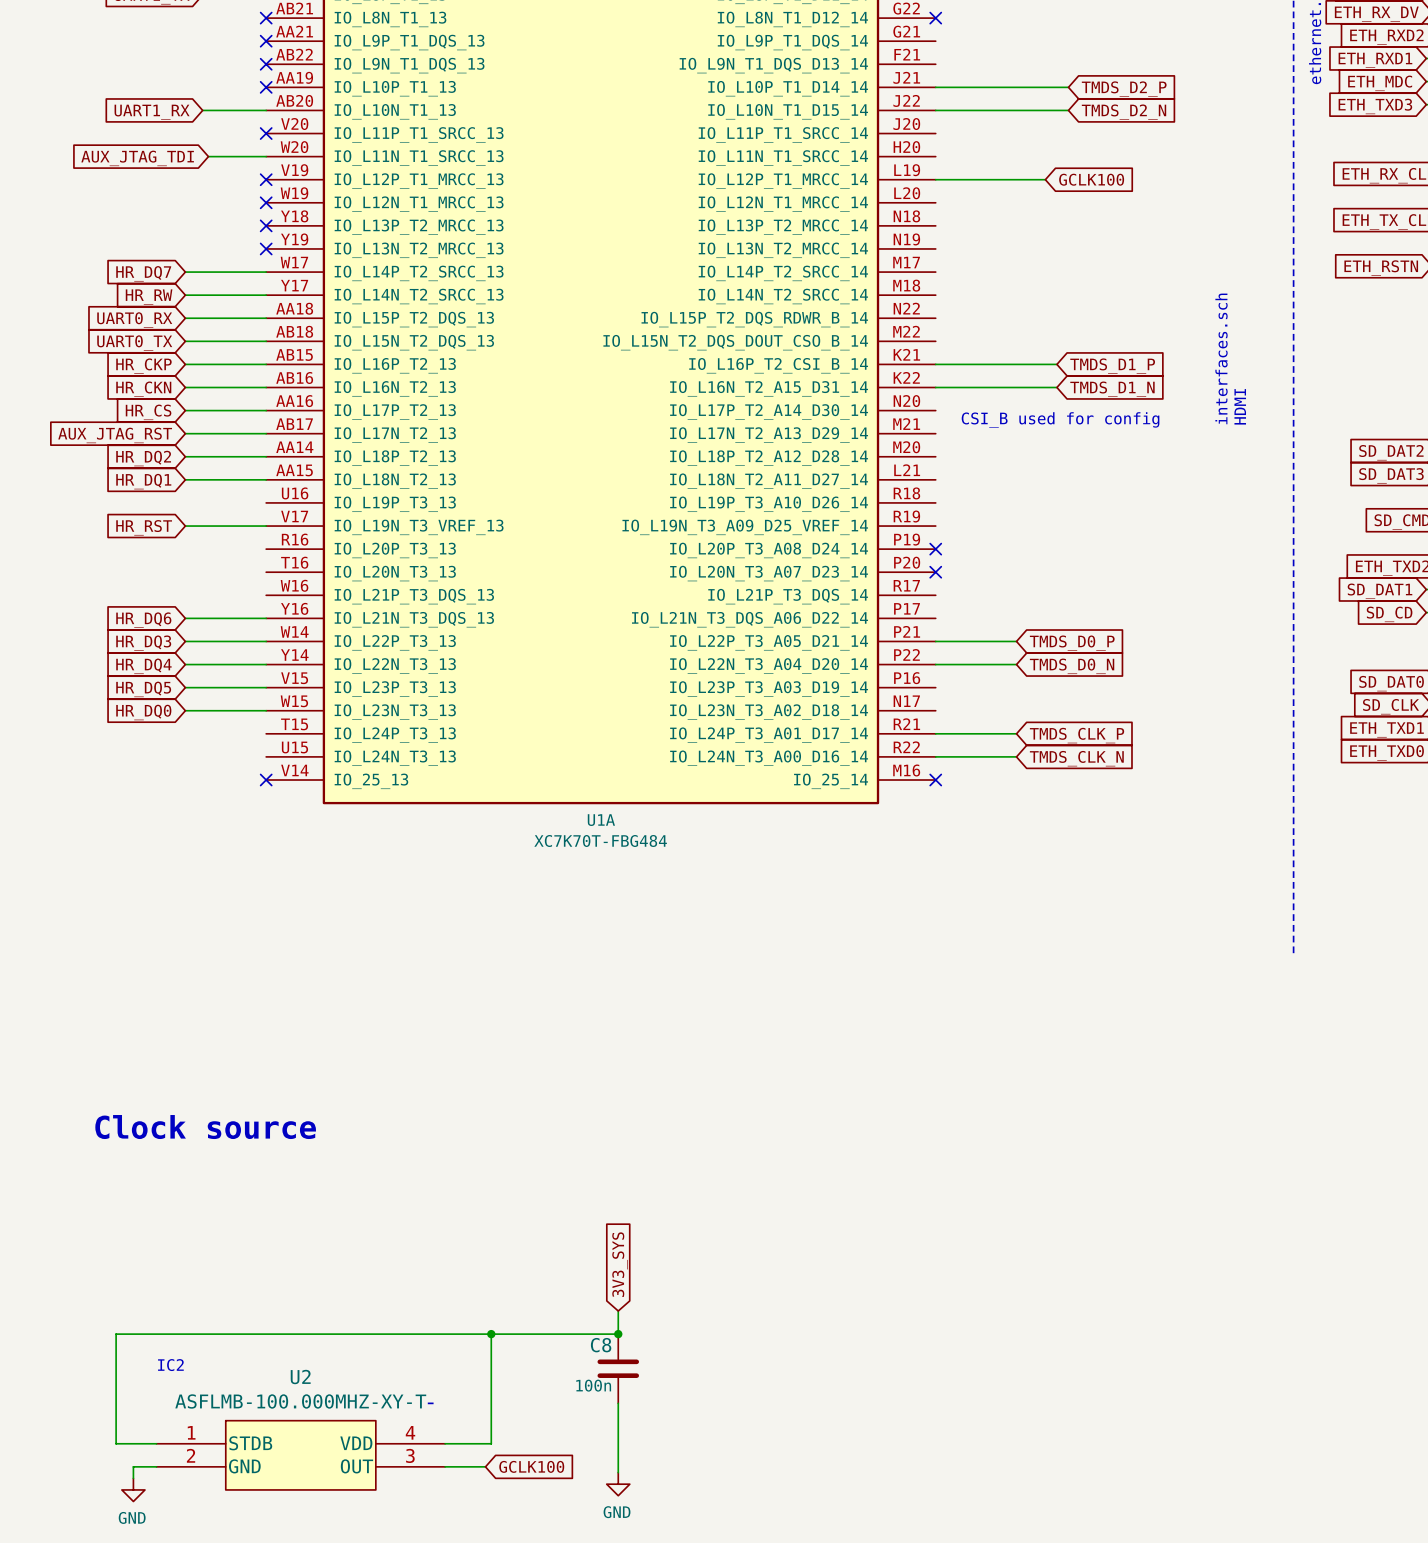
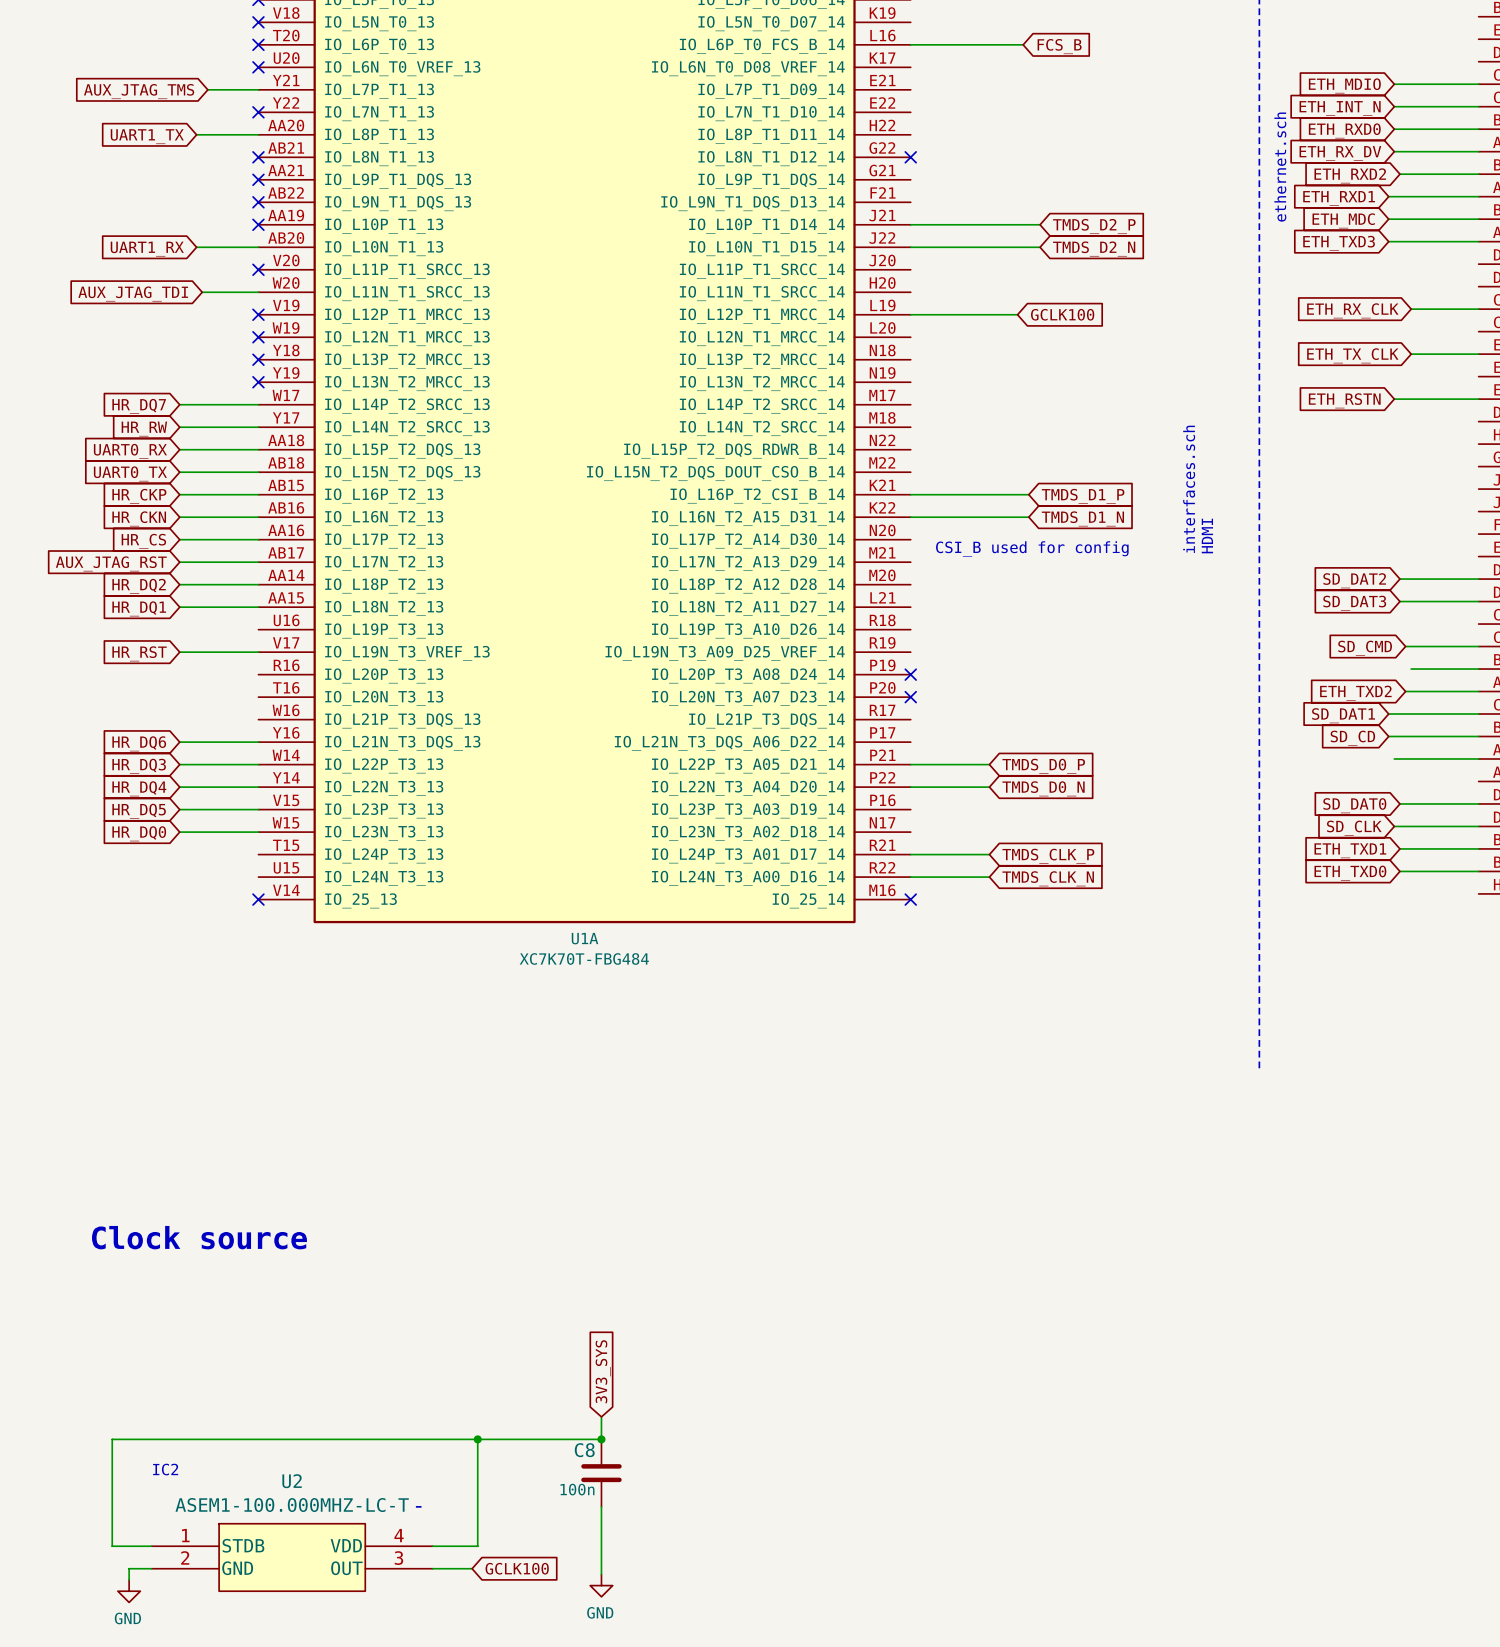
U2 value: ASFLMB-100.000MHZ-XY-T (300, 1401) -> ASEM1-100.000MHZ-LC-T (292, 1505)

